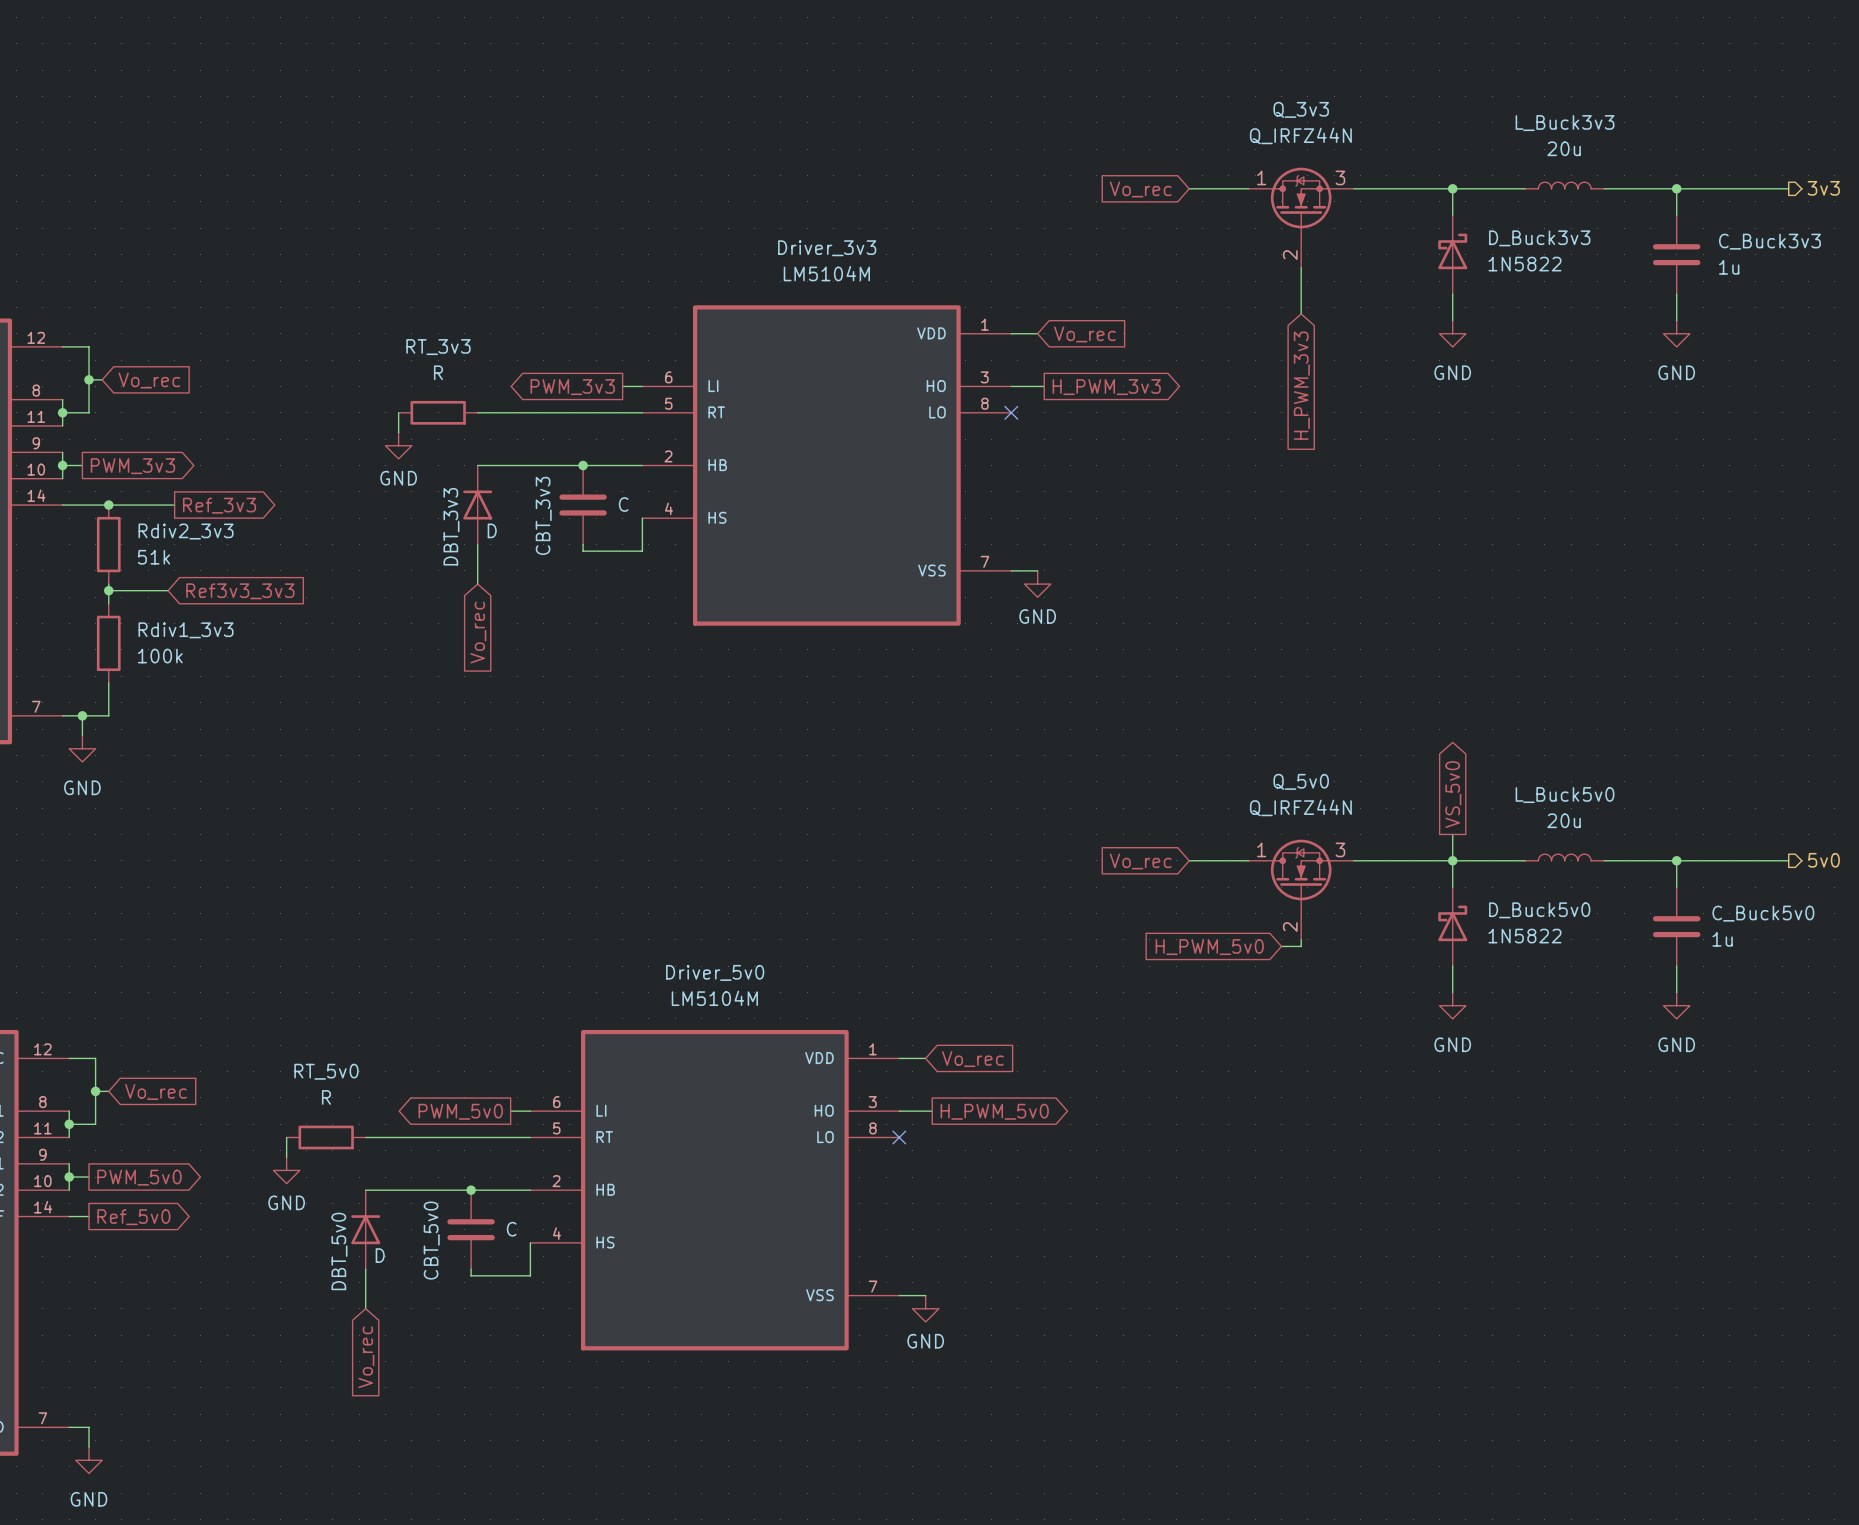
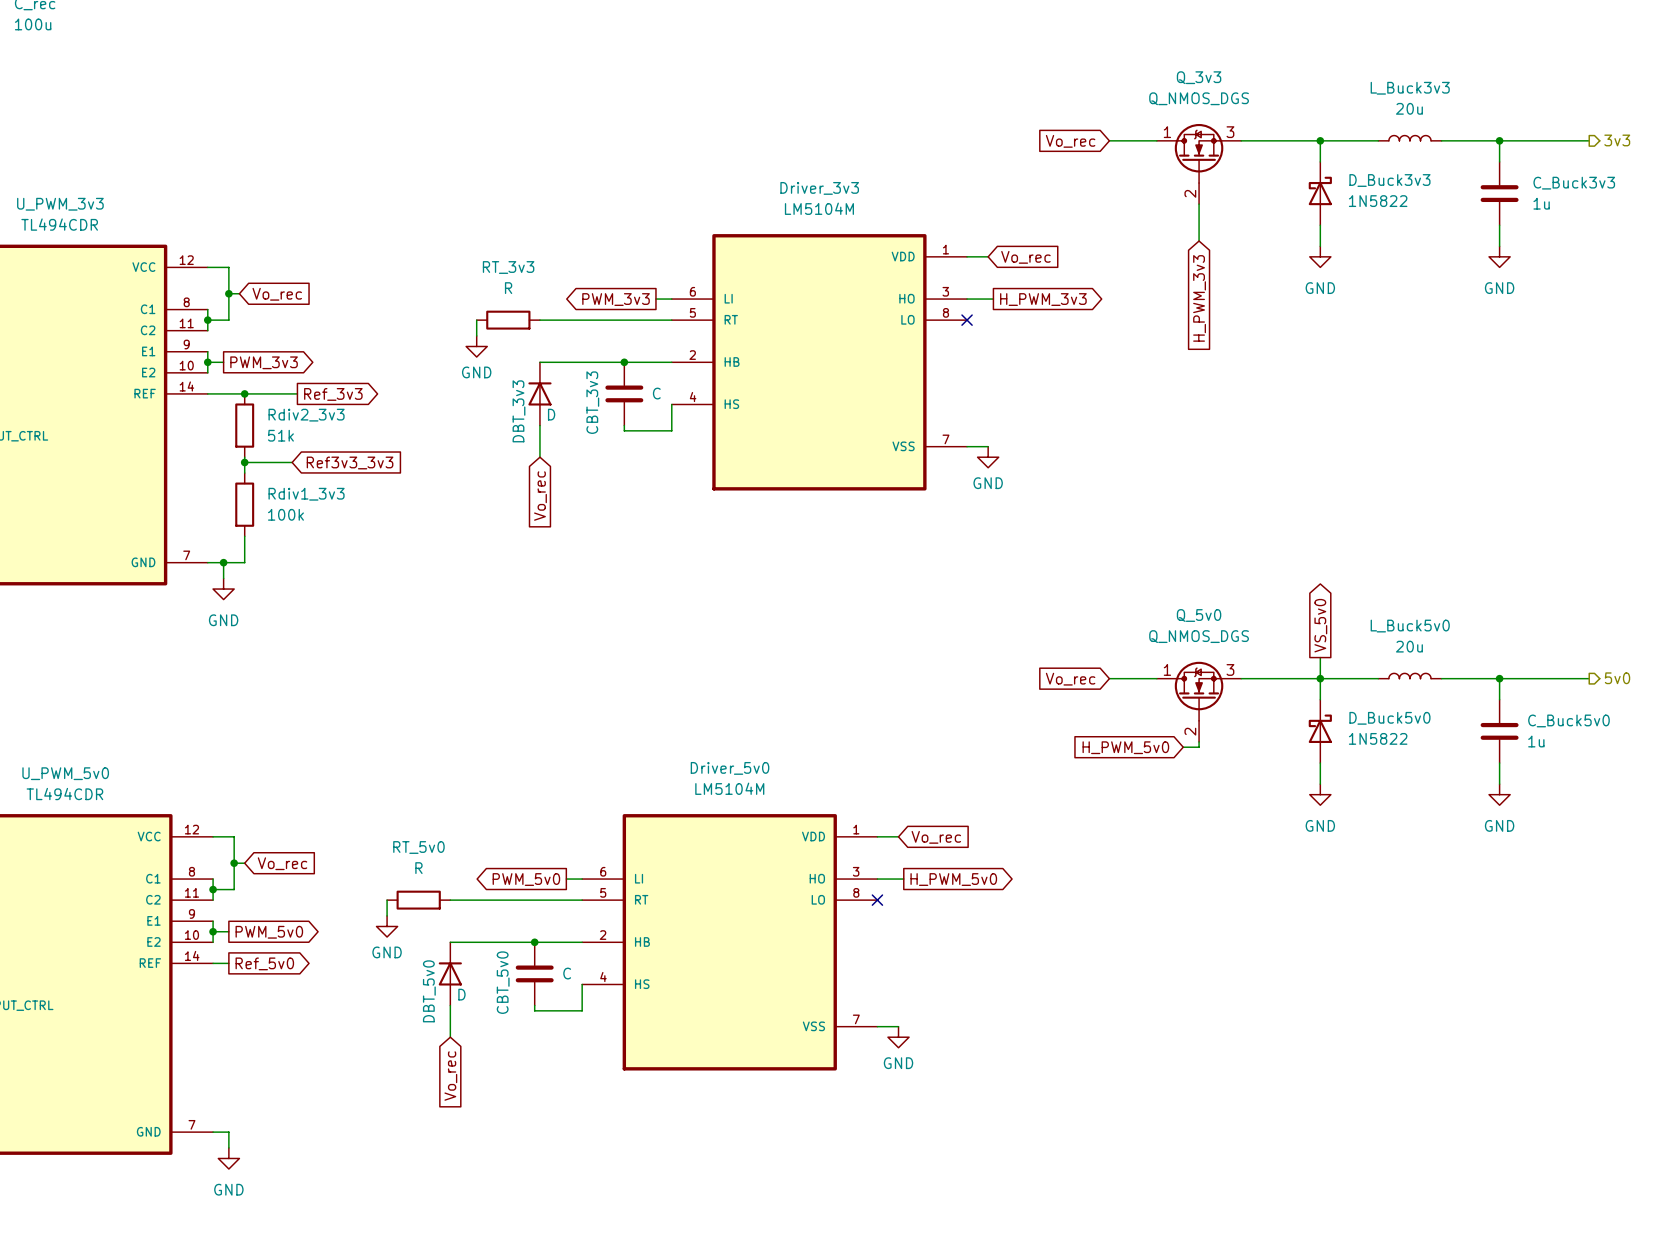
Q_3v3 value: Q_IRFZ44N (1300, 135) -> Q_NMOS_DGS (1199, 98)
Q_5v0 value: Q_IRFZ44N (1300, 807) -> Q_NMOS_DGS (1199, 636)

